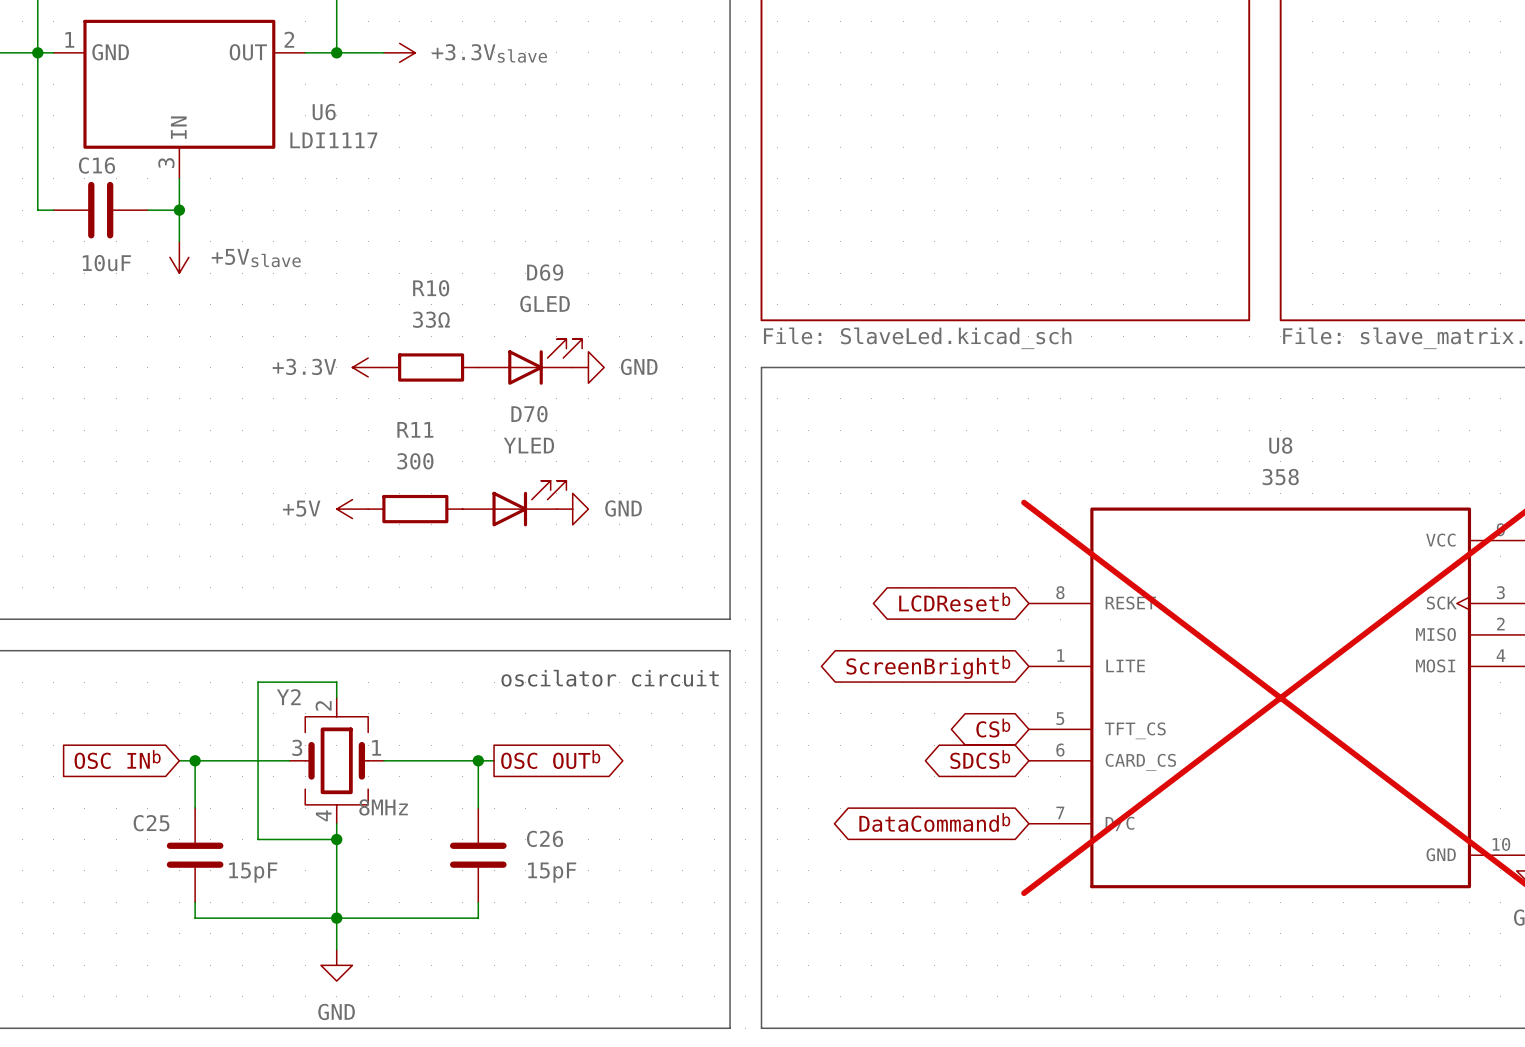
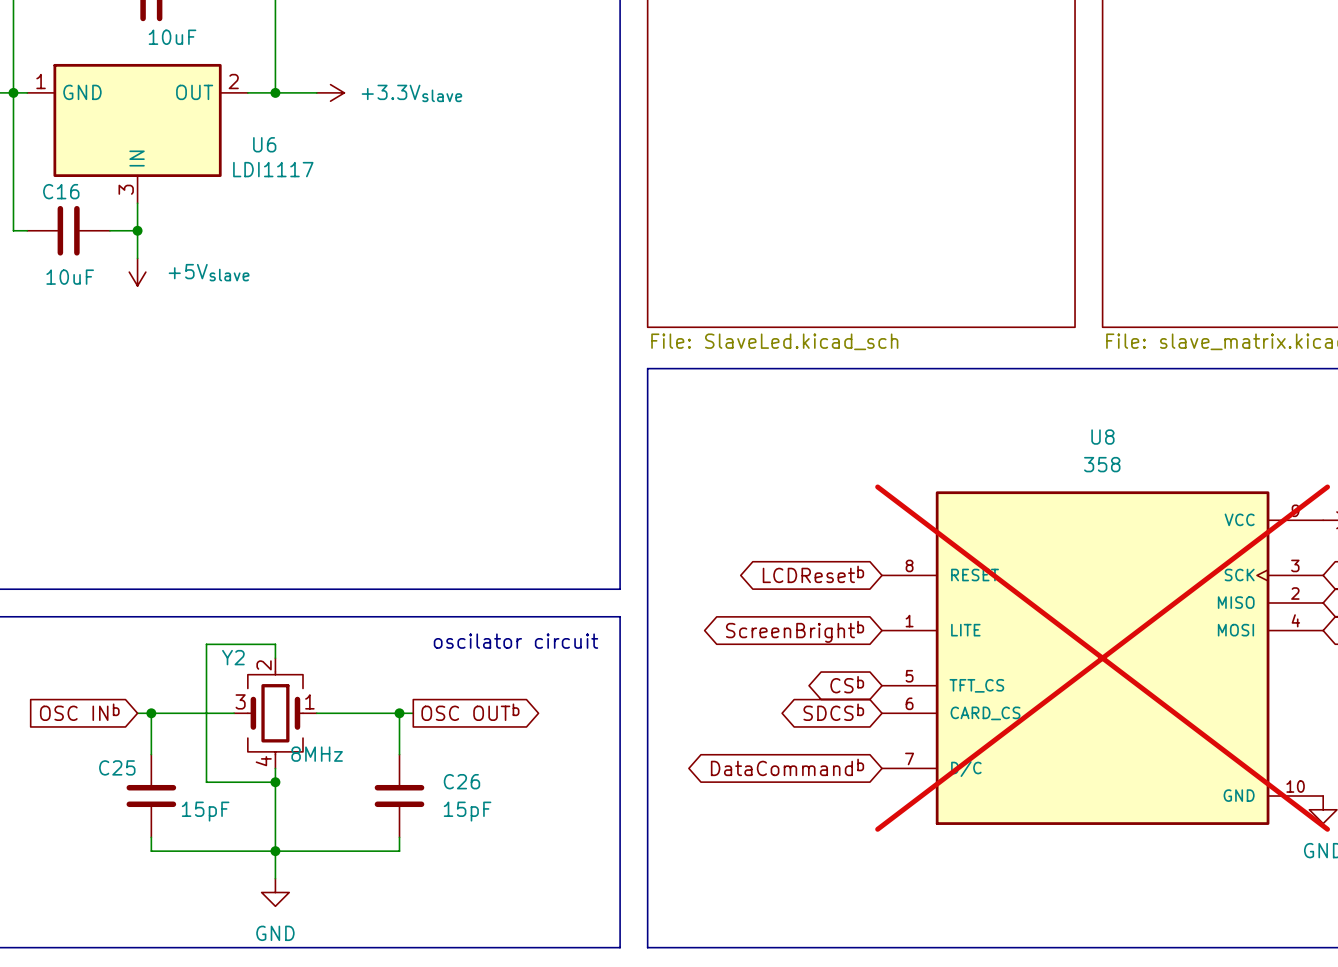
D69: GLED (530, 361) -> none
power symbol: +3.3V (368, 367) -> none
R10: 33Ω (431, 367) -> none
power symbol: GND (588, 367) -> none
D70: YLED (514, 503) -> none
power symbol: +5V (352, 509) -> none
R11: 300 (415, 509) -> none
power symbol: GND (572, 509) -> none

